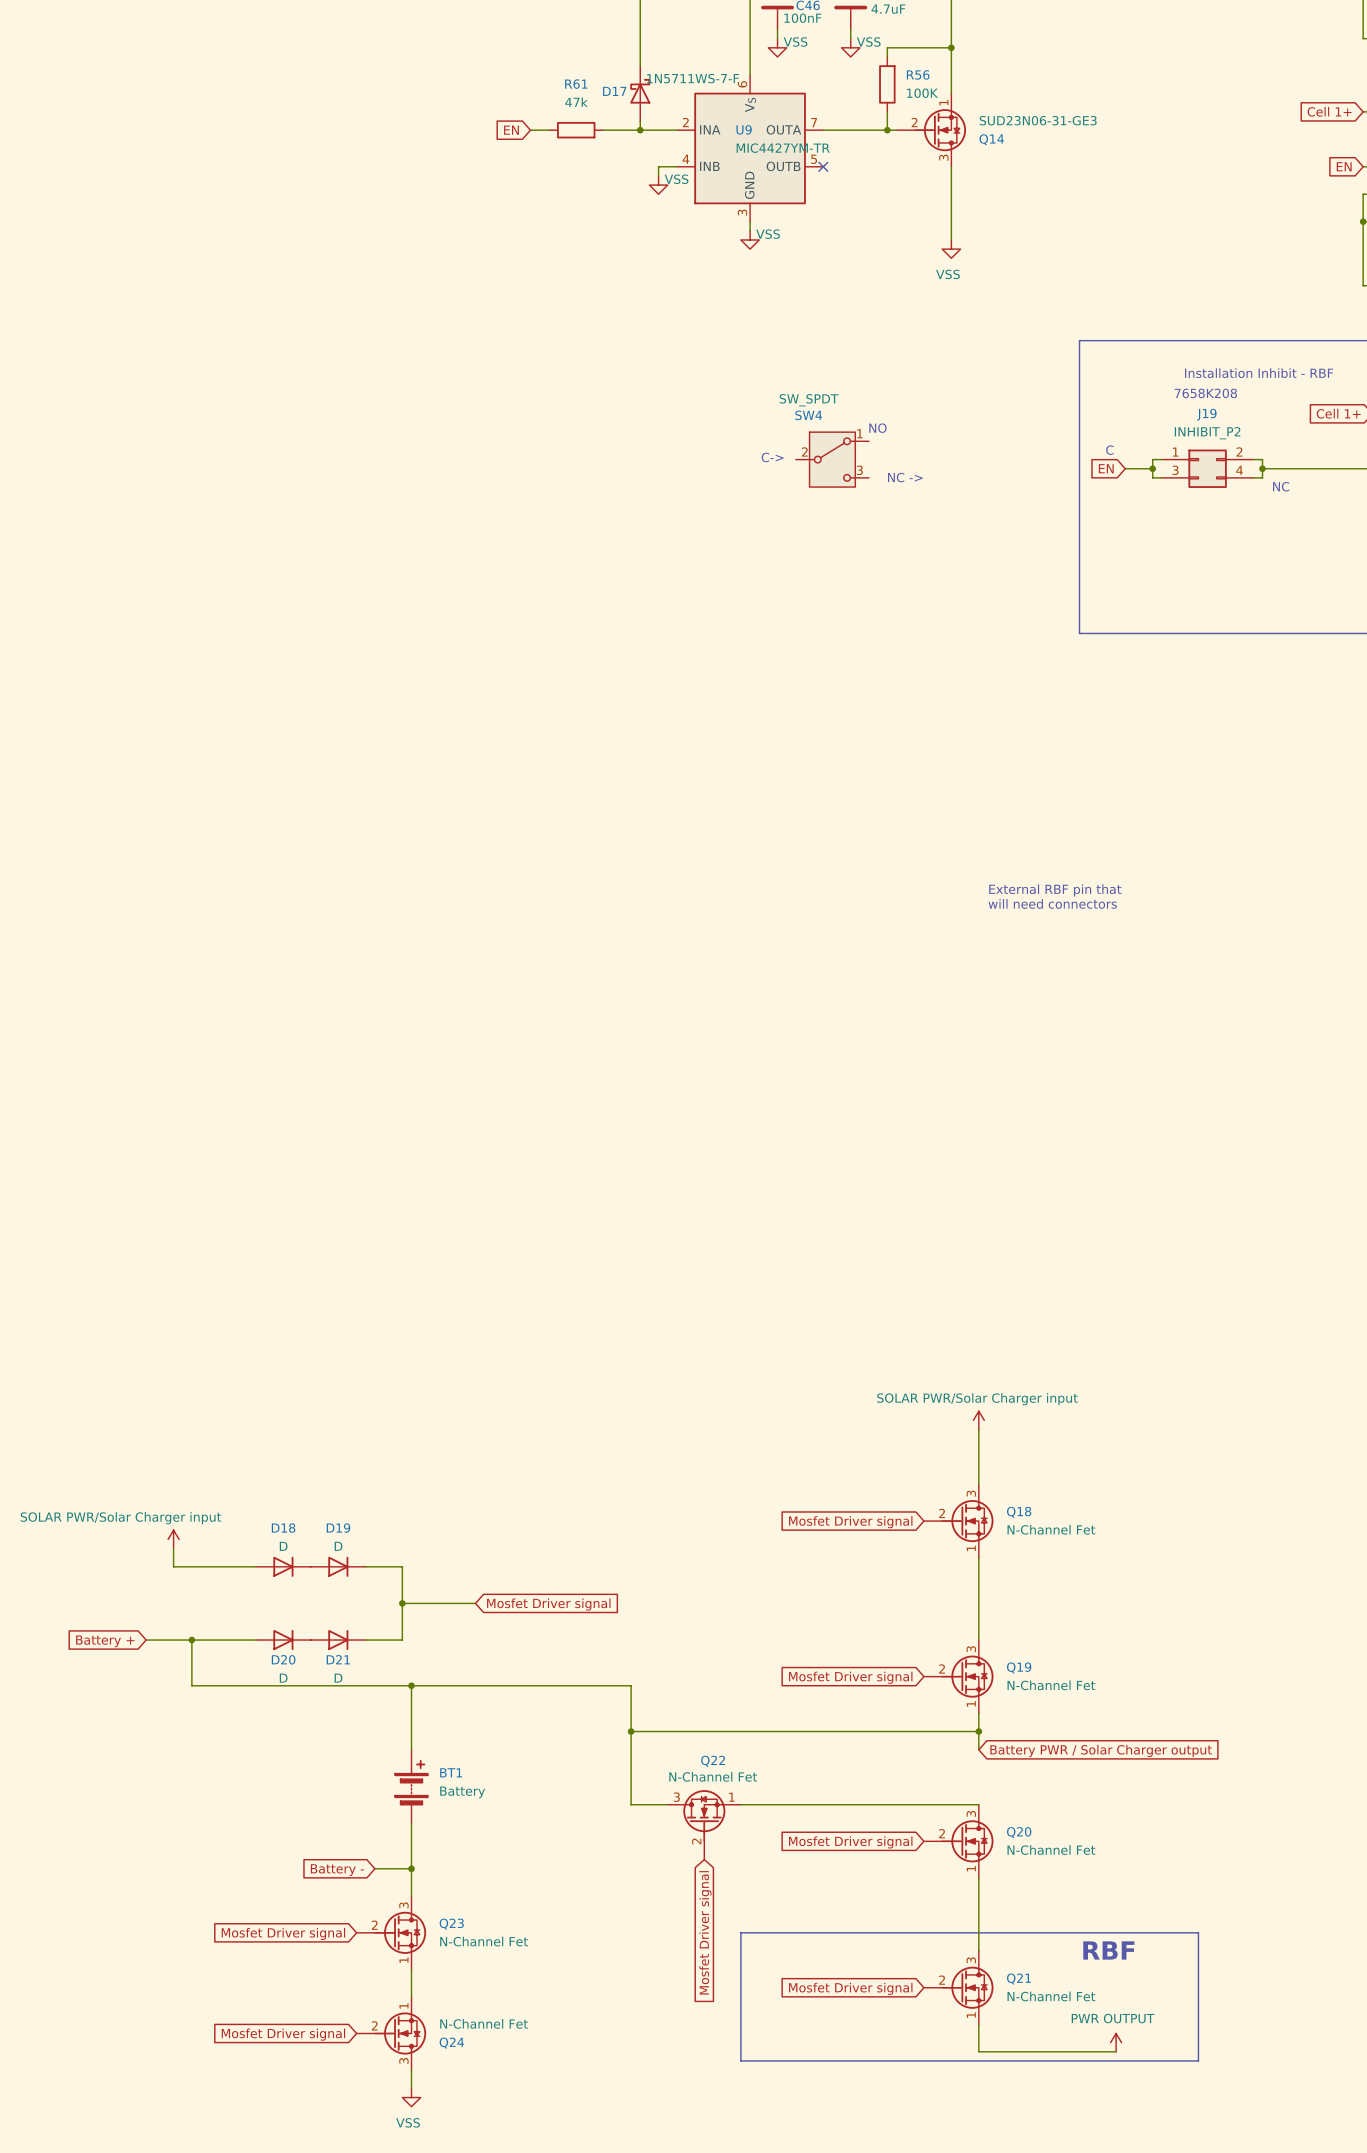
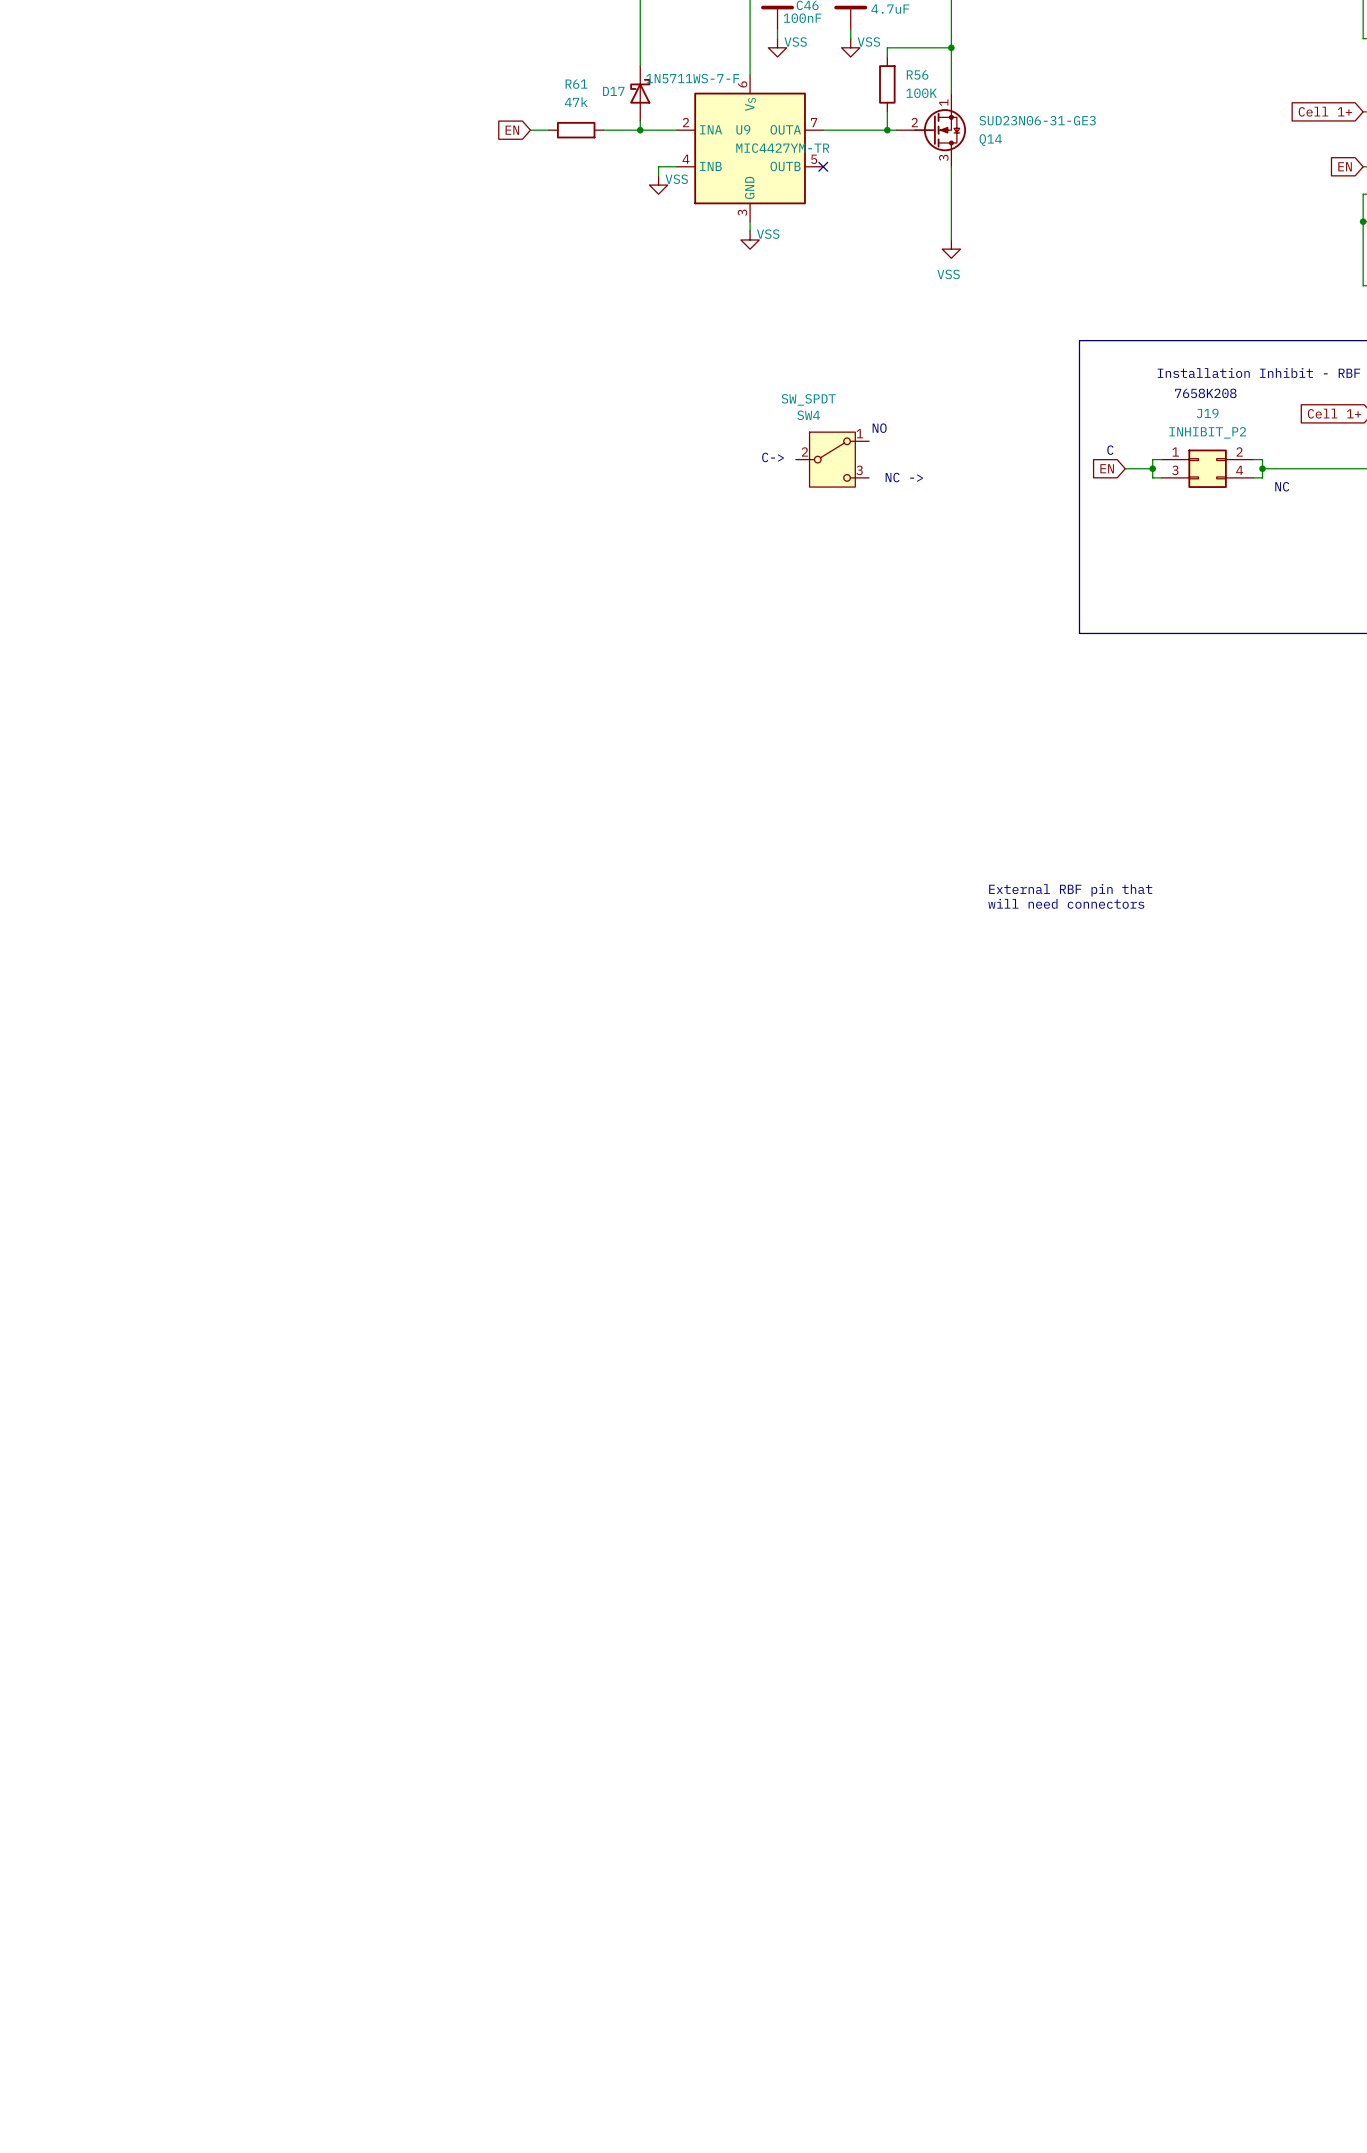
power symbol: SOLAR PWR/Solar Charger input (978, 1420) -> none
wire: (978, 1429) (978, 1484) -> none
Q18: N-Channel Fet (958, 1521) -> none
global label: Mosfet Driver signal (850, 1522) -> none
power symbol: SOLAR PWR/Solar Charger input (173, 1539) -> none
wire: (173, 1548) (173, 1566) (255, 1566) -> none
wire: (978, 1557) (978, 1640) -> none
D18: D (283, 1566) -> none
D19: D (338, 1566) -> none
wire: (365, 1566) (402, 1566) (402, 1640) (365, 1640) -> none
wire: (402, 1603) (475, 1603) -> none
junction: (402, 1603) -> none
global label: Mosfet Driver signal (548, 1604) -> none
wire: (146, 1640) (255, 1640) -> none
wire: (191, 1640) (191, 1685) (631, 1685) (631, 1804) (667, 1804) -> none
junction: (191, 1640) -> none
D20: D (283, 1640) -> none
D21: D (338, 1640) -> none
global label: Battery + (105, 1641) -> none
Q19: N-Channel Fet (958, 1676) -> none
global label: Mosfet Driver signal (850, 1677) -> none
wire: (411, 1685) (411, 1749) -> none
junction: (411, 1685) -> none
wire: (978, 1713) (978, 1749) -> none
wire: (631, 1731) (978, 1731) -> none
junction: (631, 1731) -> none
junction: (978, 1731) -> none
global label: Battery PWR / Solar Charger output (1101, 1750) -> none
BT1: Battery (411, 1786) -> none
wire: (740, 1804) (978, 1804) -> none
wire: (411, 1823) (411, 1896) -> none
Q22: N-Channel Fet (704, 1824) -> none
Q20: N-Channel Fet (958, 1841) -> none
global label: Mosfet Driver signal (850, 1842) -> none
wire: (374, 1868) (411, 1868) -> none
junction: (411, 1868) -> none
global label: Battery - (337, 1870) -> none
wire: (978, 1877) (978, 1951) -> none
Q23: N-Channel Fet (391, 1932) -> none
global label: Mosfet Driver signal (705, 1932) -> none
line: (740, 1932) (1198, 1932) (1198, 2060) (740, 2060) (740, 1932) -> none
global label: Mosfet Driver signal (283, 1933) -> none
text: RBF (1108, 1950) -> none
wire: (411, 1969) (411, 1996) -> none
Q21: N-Channel Fet (958, 1987) -> none
global label: Mosfet Driver signal (850, 1988) -> none
wire: (978, 2024) (978, 2051) (1116, 2051) -> none
Q24: N-Channel Fet (391, 2033) -> none
global label: Mosfet Driver signal (283, 2034) -> none
power symbol: PWR OUTPUT (1116, 2042) -> none
wire: (411, 2070) (411, 2088) -> none
power symbol: VSS (411, 2097) -> none

